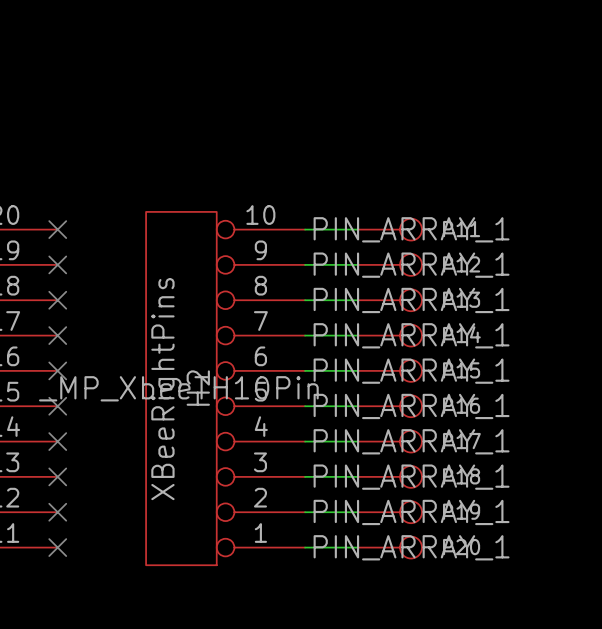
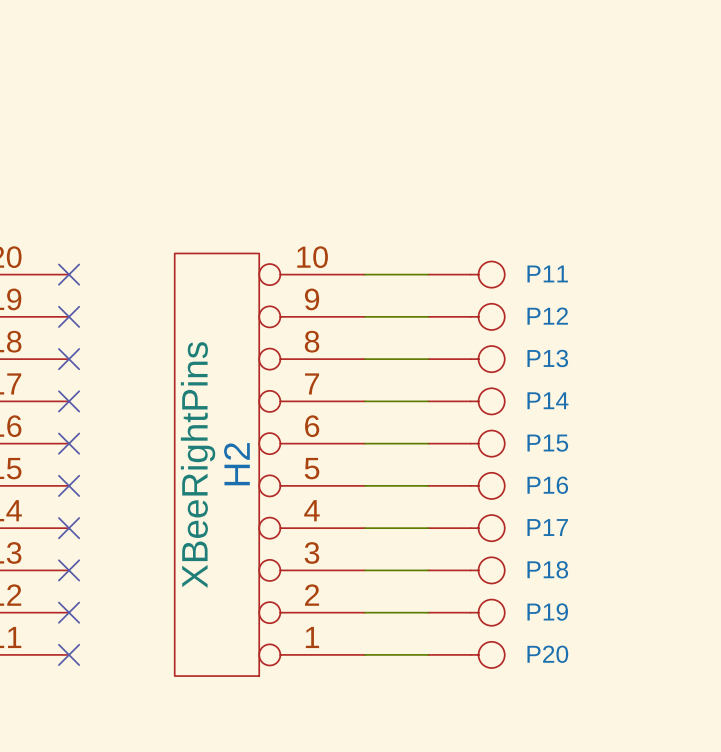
P11 text: PIN_ARRAY_1 (411, 229) -> none
P12 text: PIN_ARRAY_1 (411, 265) -> none
P13 text: PIN_ARRAY_1 (411, 300) -> none
P14 text: PIN_ARRAY_1 (411, 335) -> none
P15 text: PIN_ARRAY_1 (411, 371) -> none
H2 text: _MP_XbeeTH10Pin (178, 388) -> none
P16 text: PIN_ARRAY_1 (411, 406) -> none
P17 text: PIN_ARRAY_1 (411, 441) -> none
P18 text: PIN_ARRAY_1 (411, 477) -> none
P19 text: PIN_ARRAY_1 (411, 512) -> none
P20 text: PIN_ARRAY_1 (411, 547) -> none

